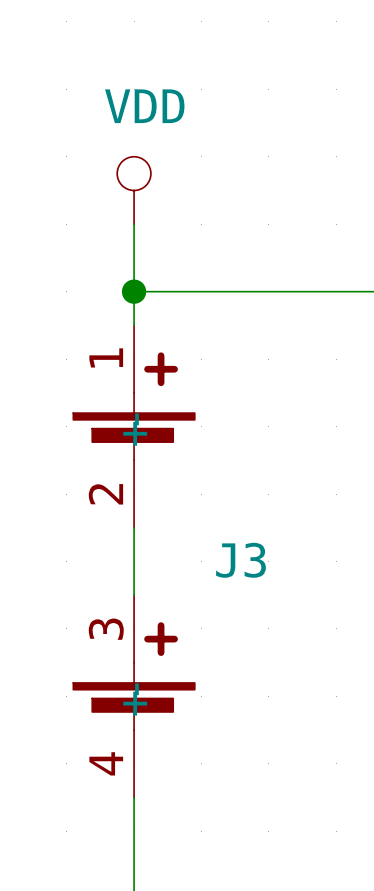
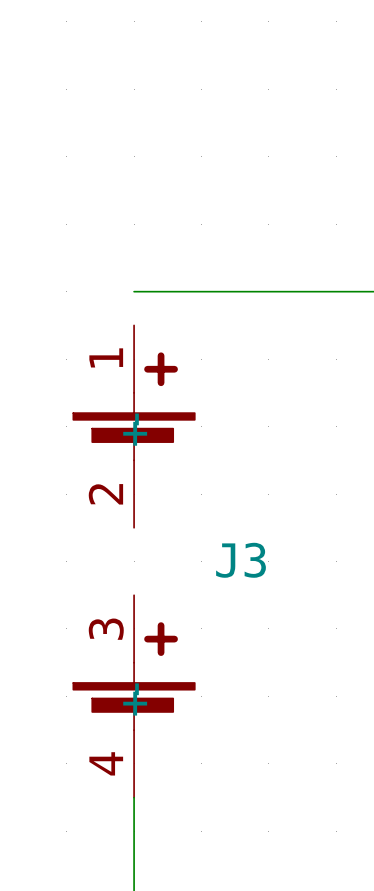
power symbol: VDD (134, 190) -> none
wire: (134, 224) (134, 325) -> none
junction: (134, 291) -> none
wire: (134, 527) (134, 595) -> none

